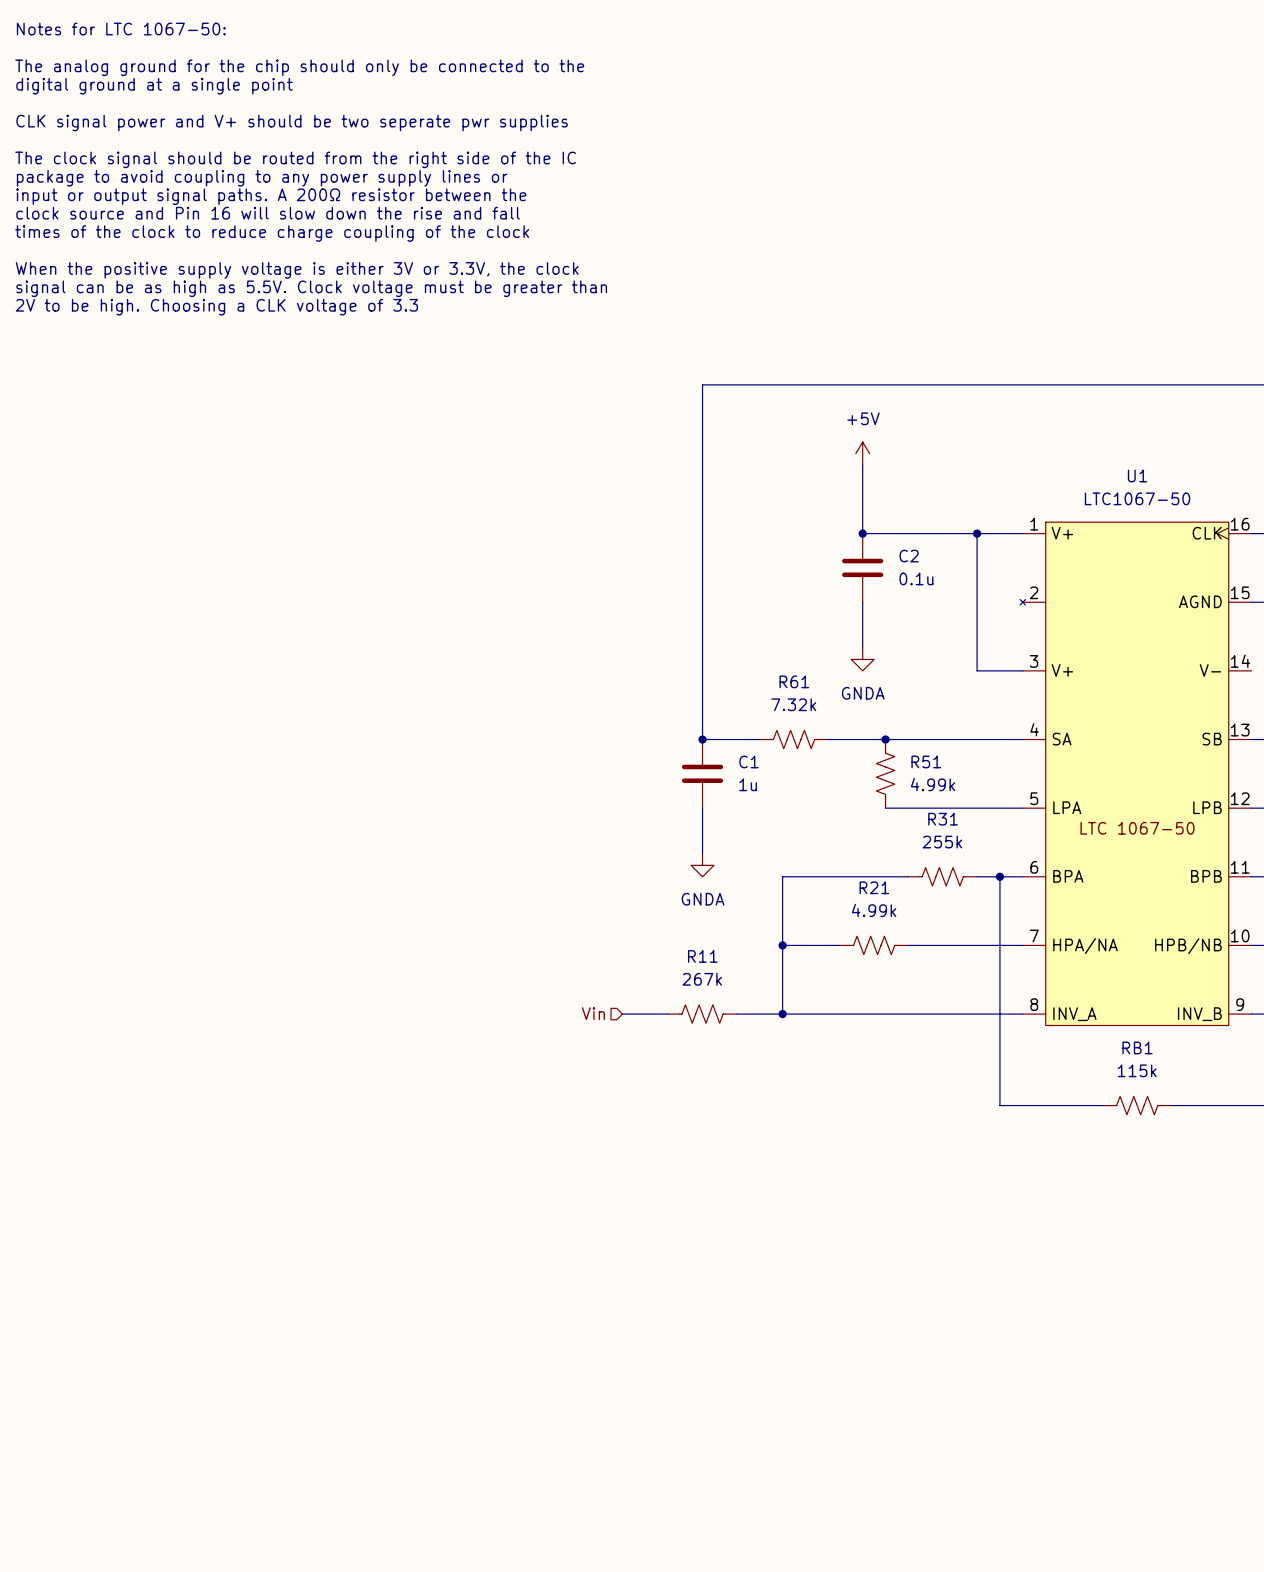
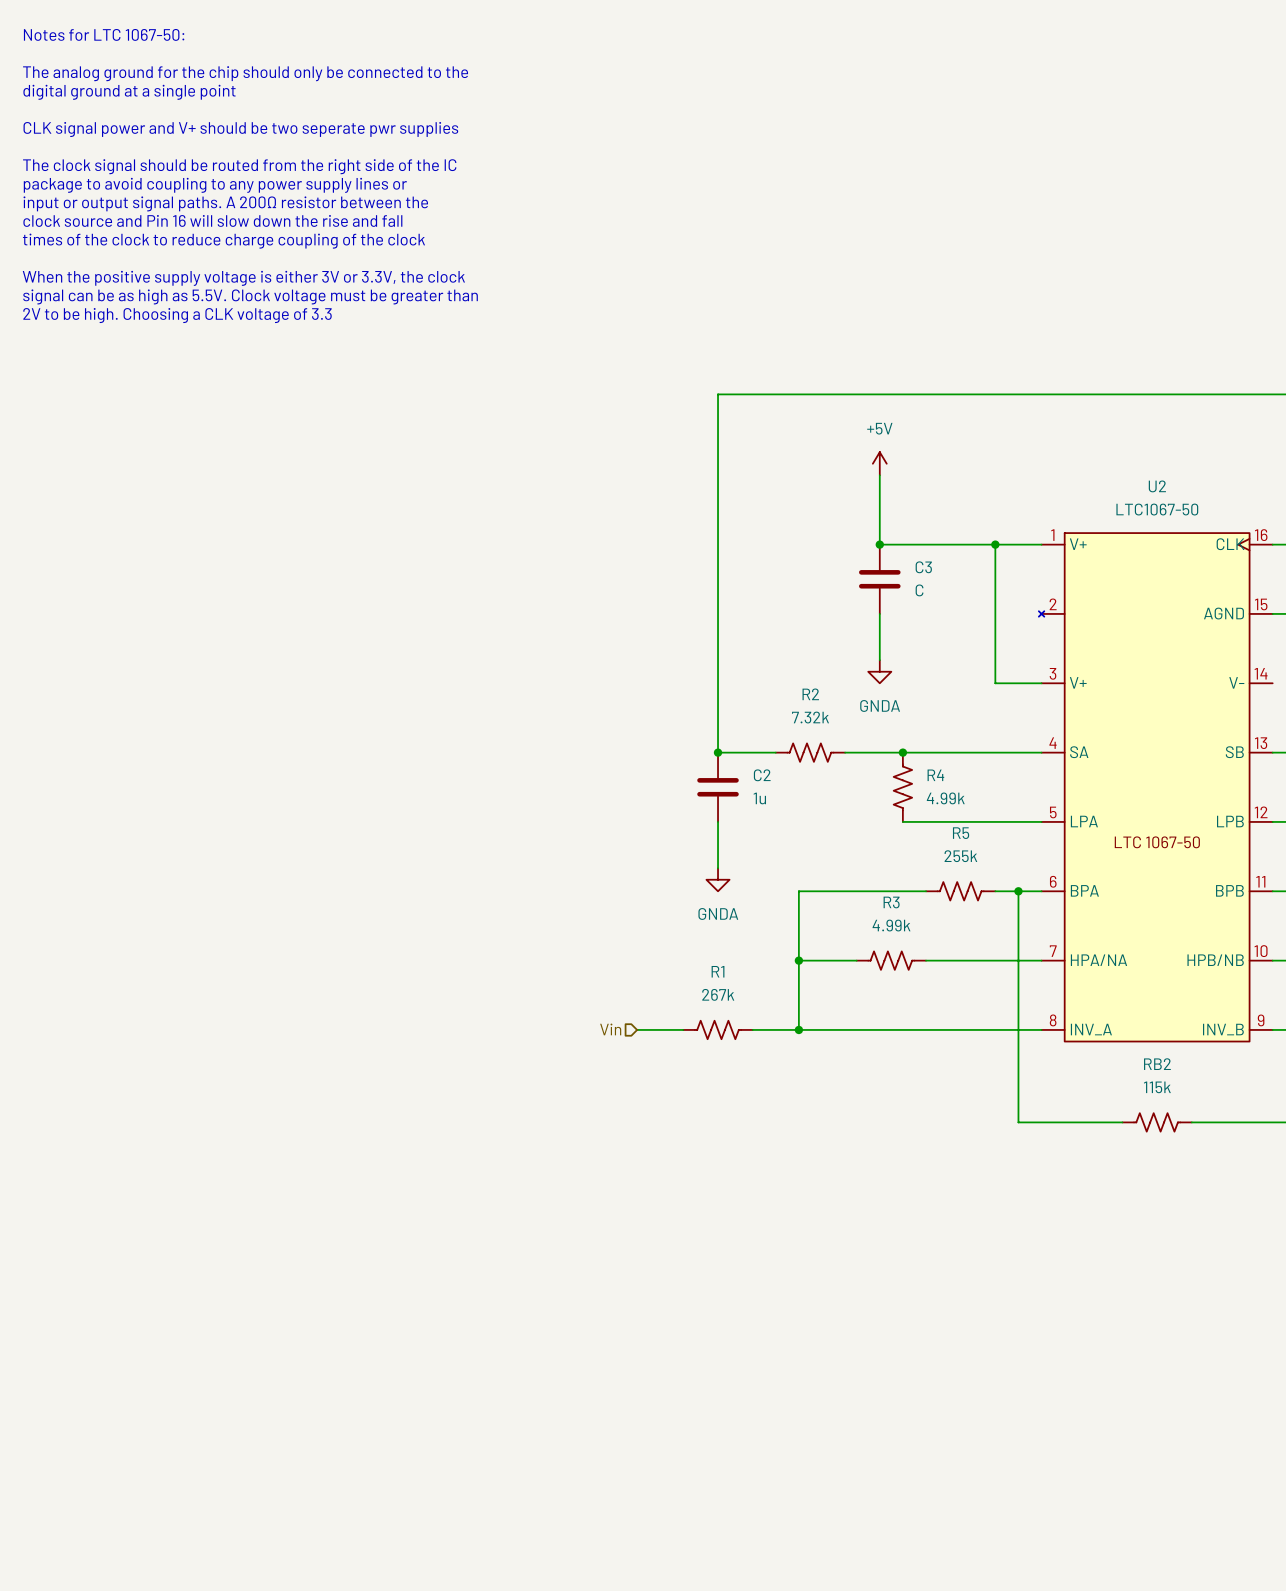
U1 name: U1 (1137, 475) -> U2 (1157, 486)
C2 name: C2 (909, 556) -> C3 (923, 567)
C2 value: 0.1u (916, 578) -> C (919, 590)
R61 name: R61 (794, 681) -> R2 (810, 694)
C1 name: C1 (748, 761) -> C2 (762, 775)
R51 name: R51 (926, 761) -> R4 (935, 775)
R31 name: R31 (943, 819) -> R5 (961, 833)
R21 name: R21 (874, 887) -> R3 (891, 902)
R11 name: R11 (702, 956) -> R1 (718, 971)
RB1 name: RB1 (1137, 1047) -> RB2 (1157, 1064)

